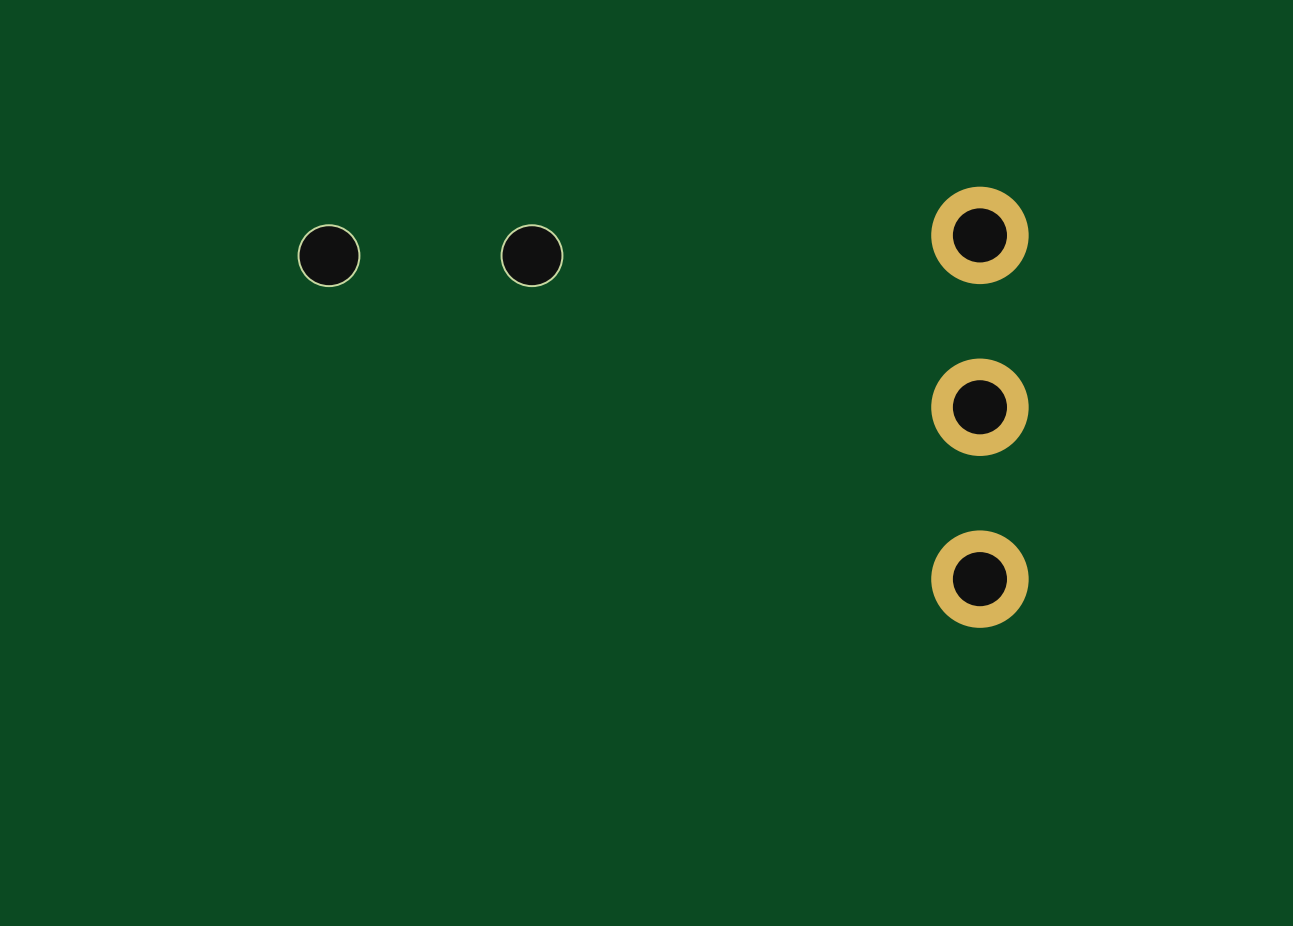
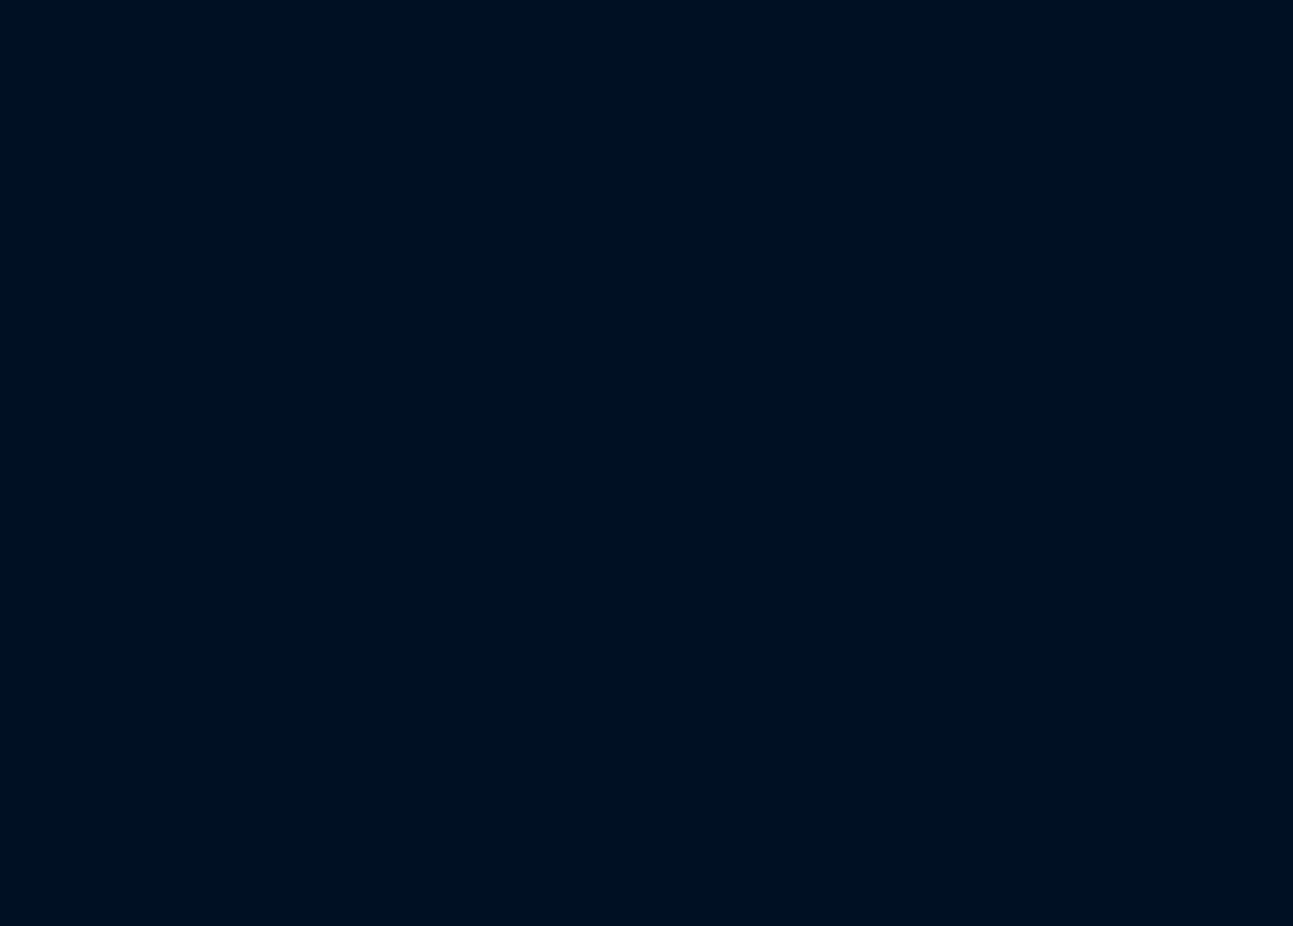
part: (430, 255) -> none
part: (979, 407) -> none

